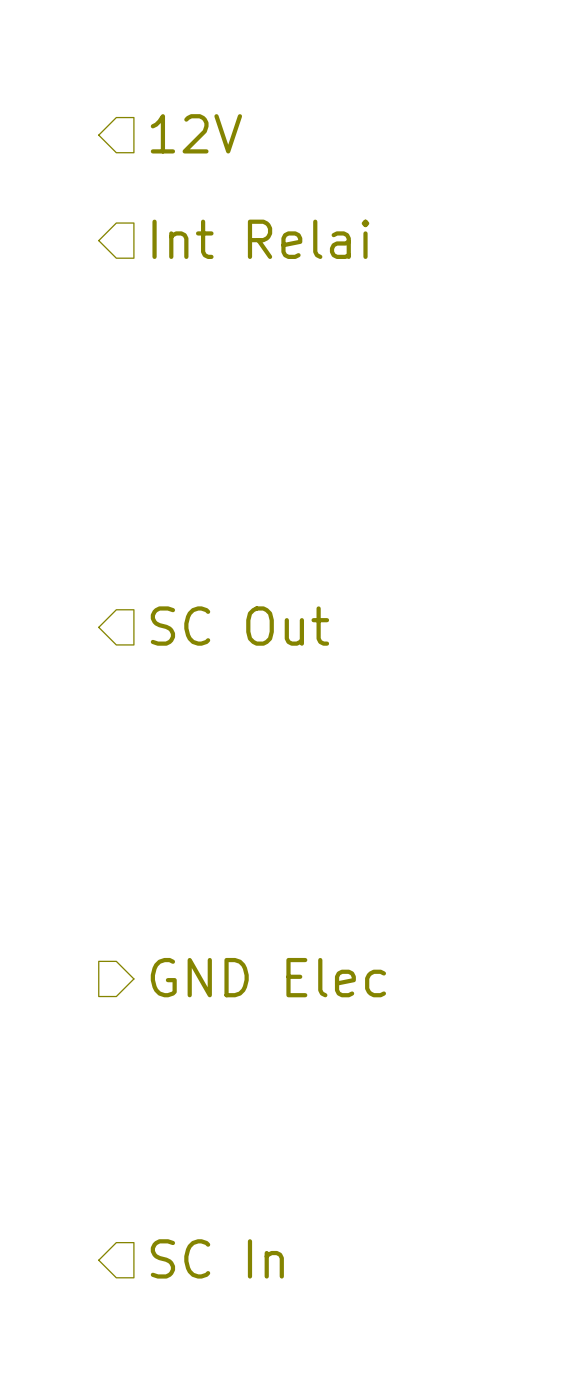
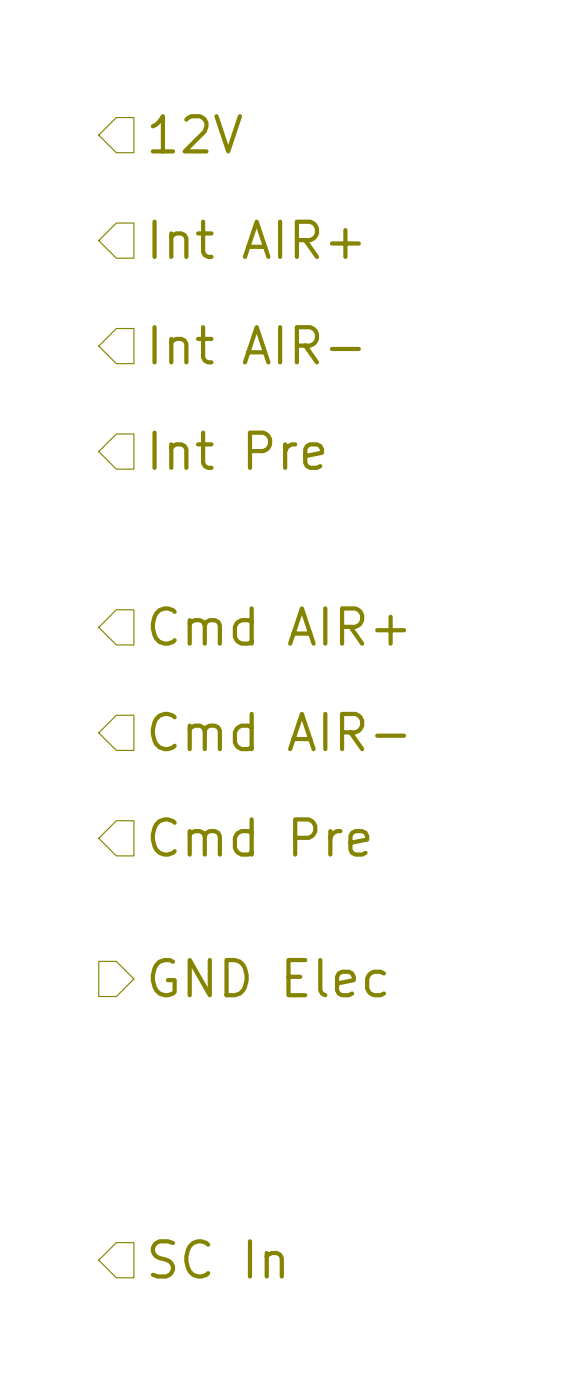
hierarchical label: Int Relai (260, 239) -> Int AIR+ (256, 239)
hierarchical label: none -> Int AIR- (256, 344)
hierarchical label: none -> Int Pre (238, 450)
hierarchical label: SC Out (239, 626) -> Cmd AIR+ (278, 626)
hierarchical label: none -> Cmd AIR- (278, 731)
hierarchical label: none -> Cmd Pre (260, 837)

